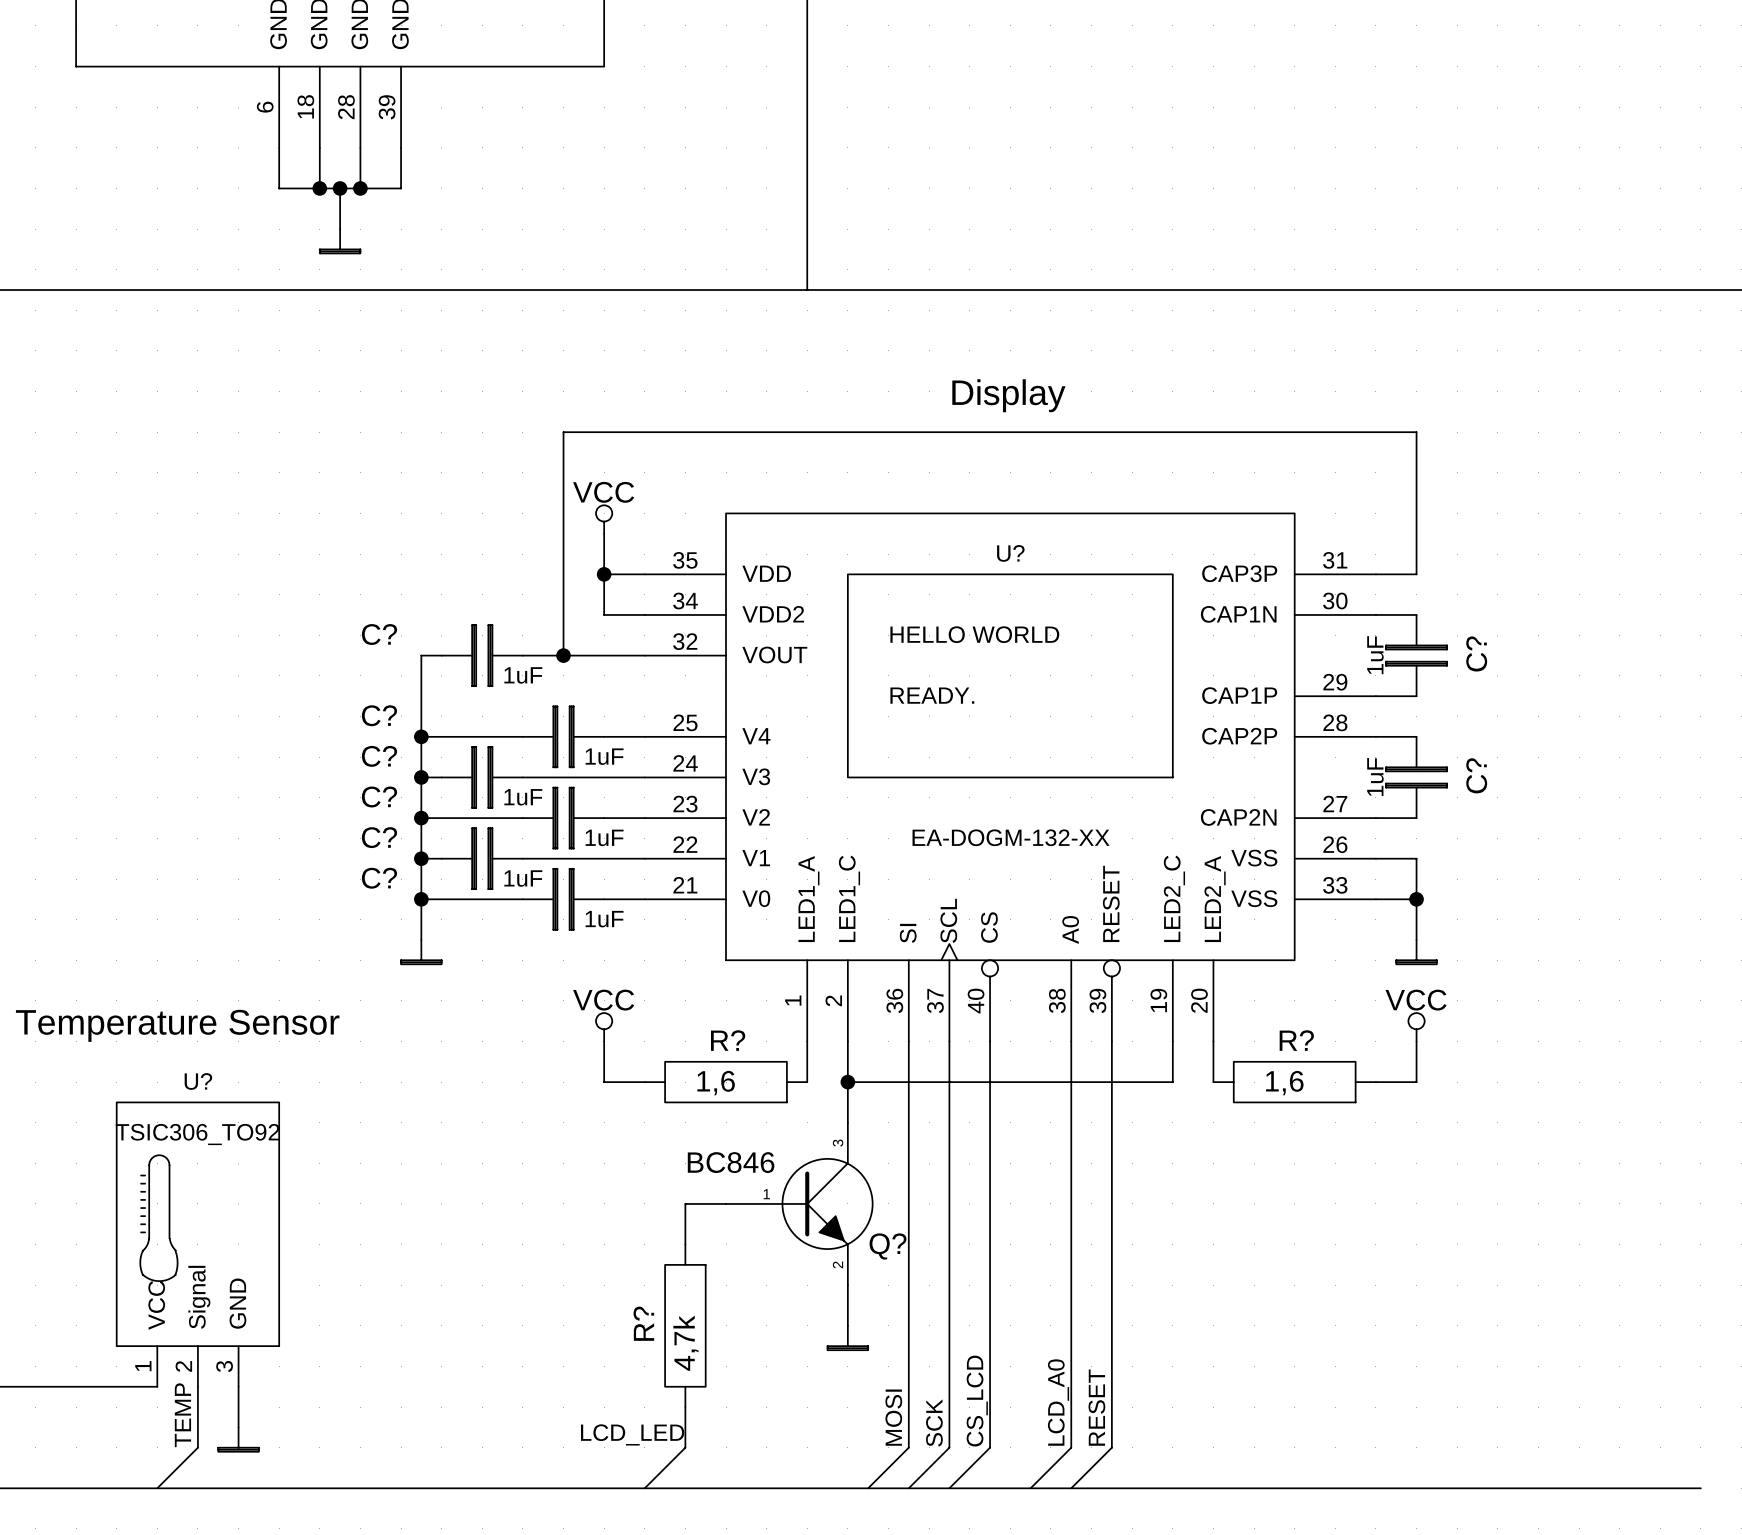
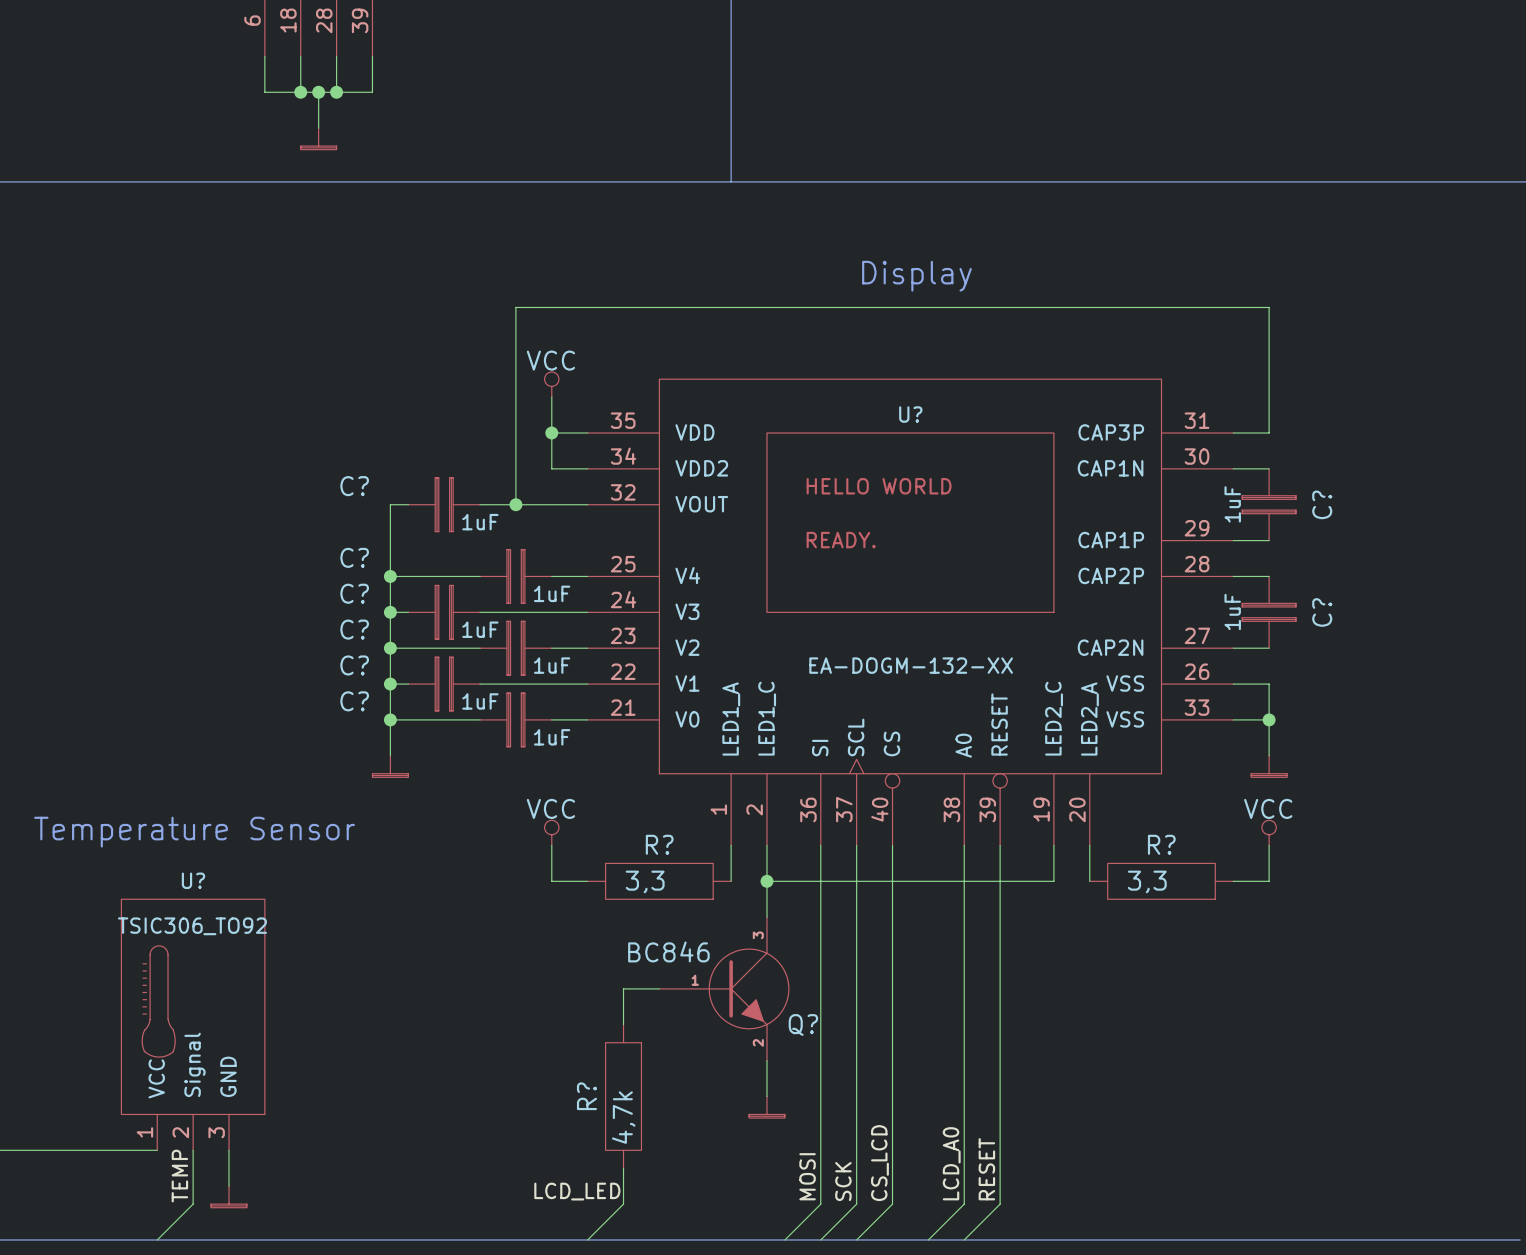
R? value: 1,6 (716, 1083) -> 3,3 (645, 881)
R? value: 1,6 (1284, 1083) -> 3,3 (1147, 881)

